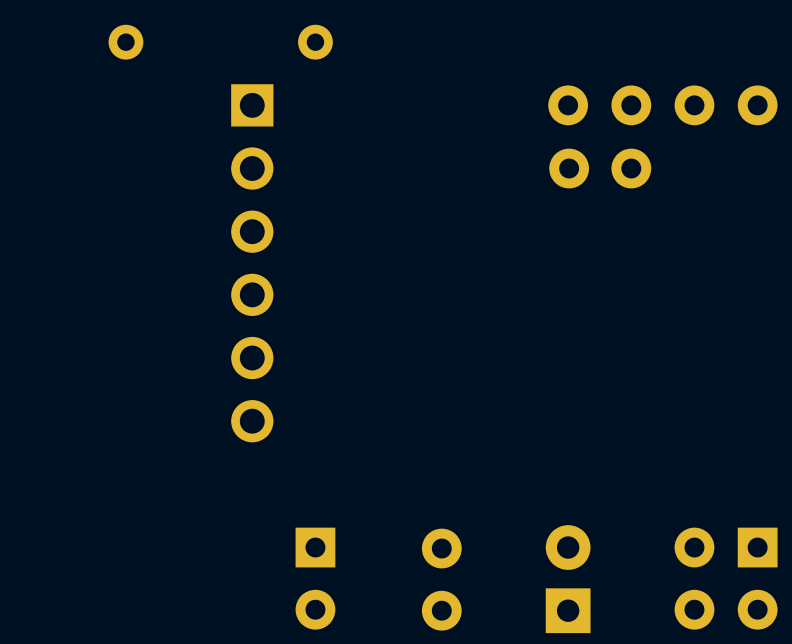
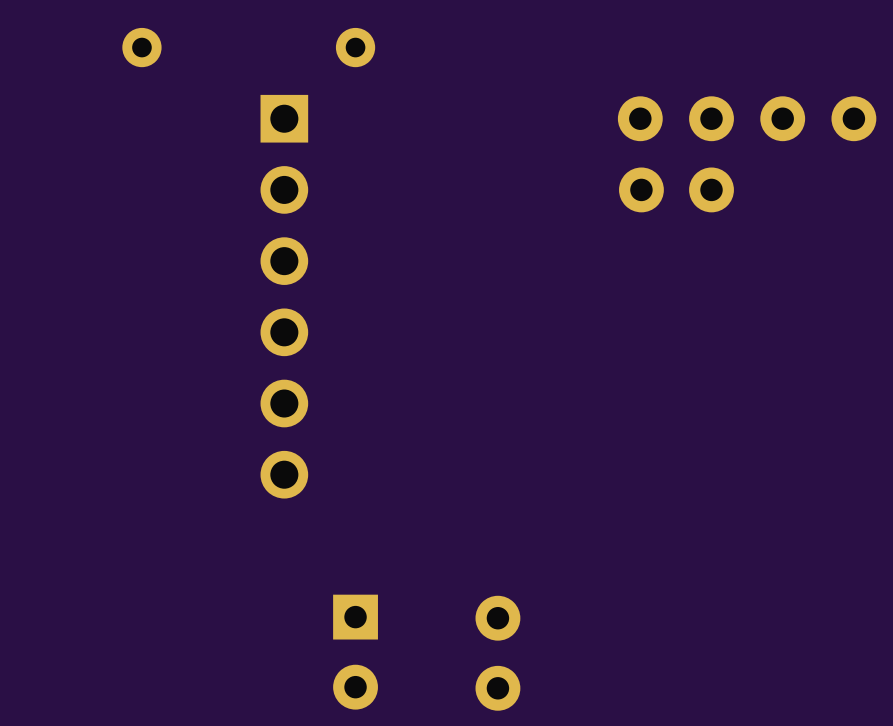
part: (694, 578) -> none
part: (757, 578) -> none
part: (568, 579) -> none

